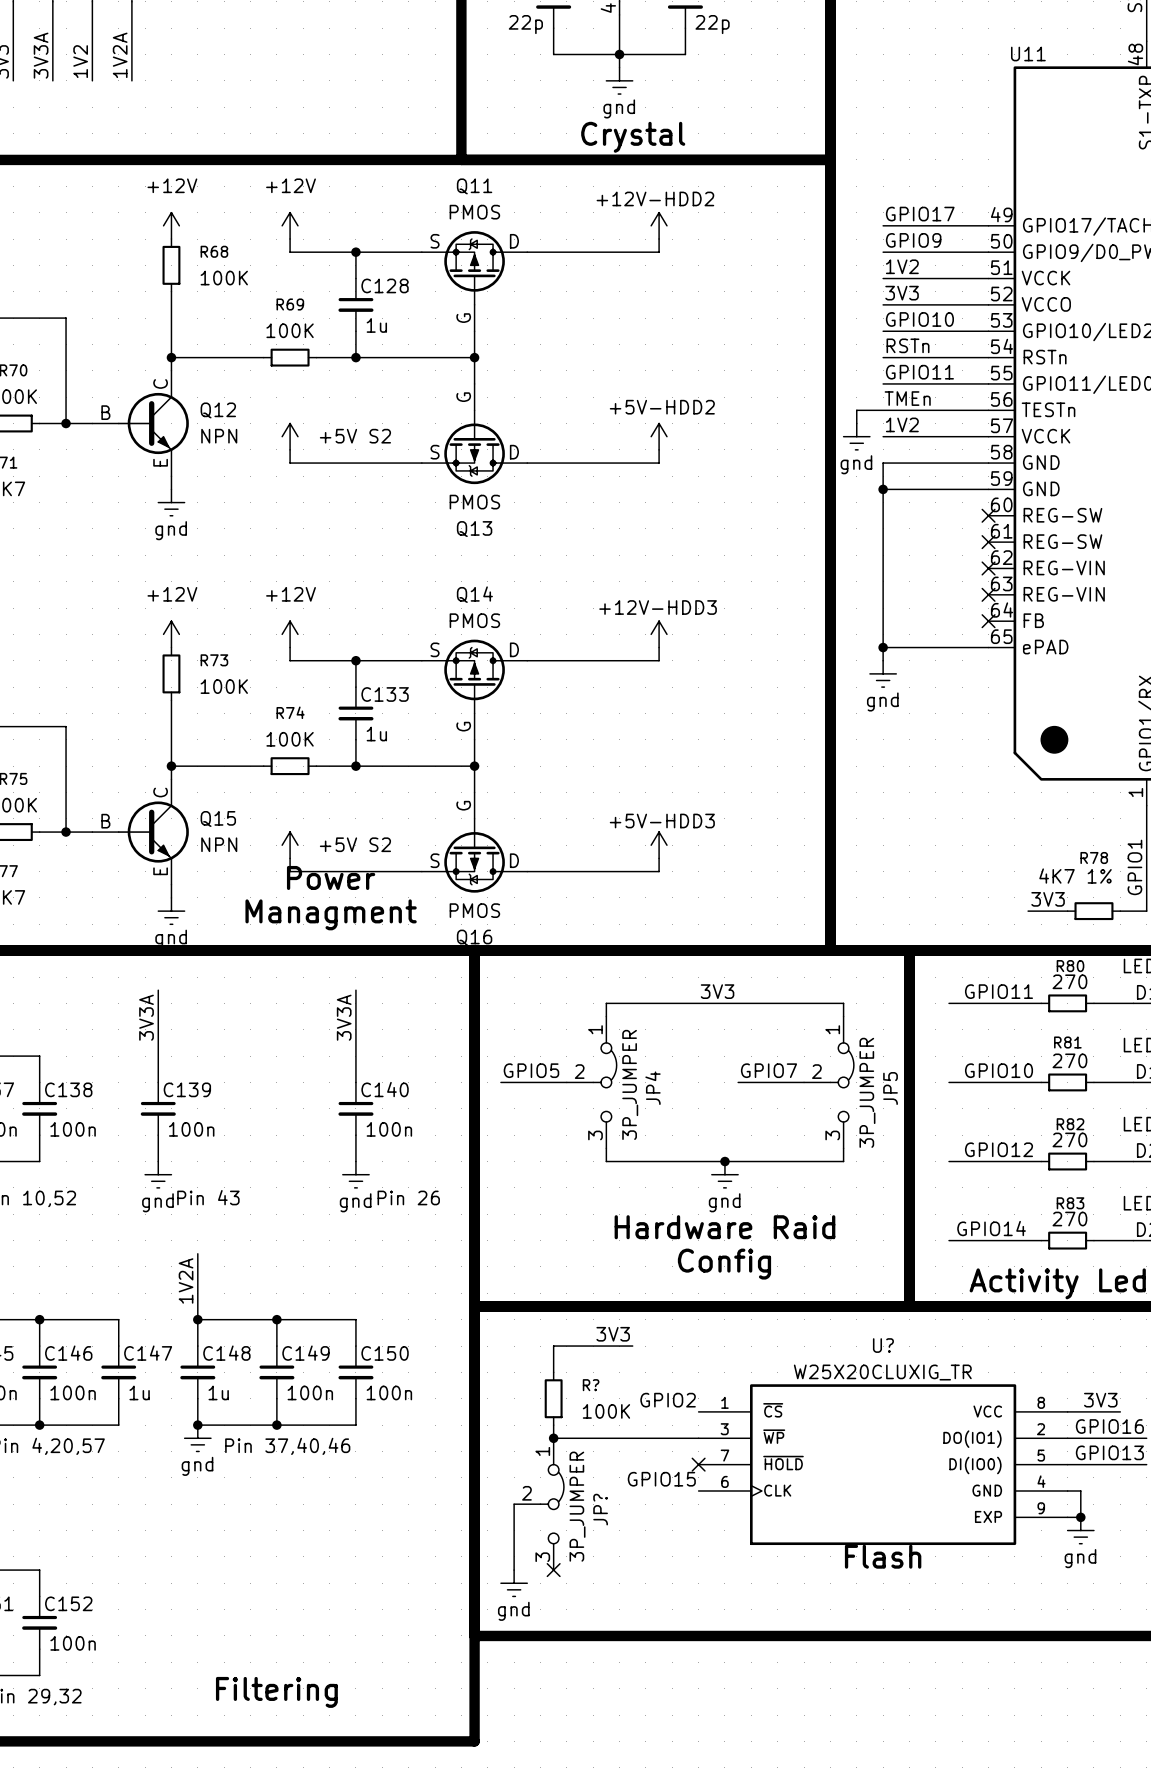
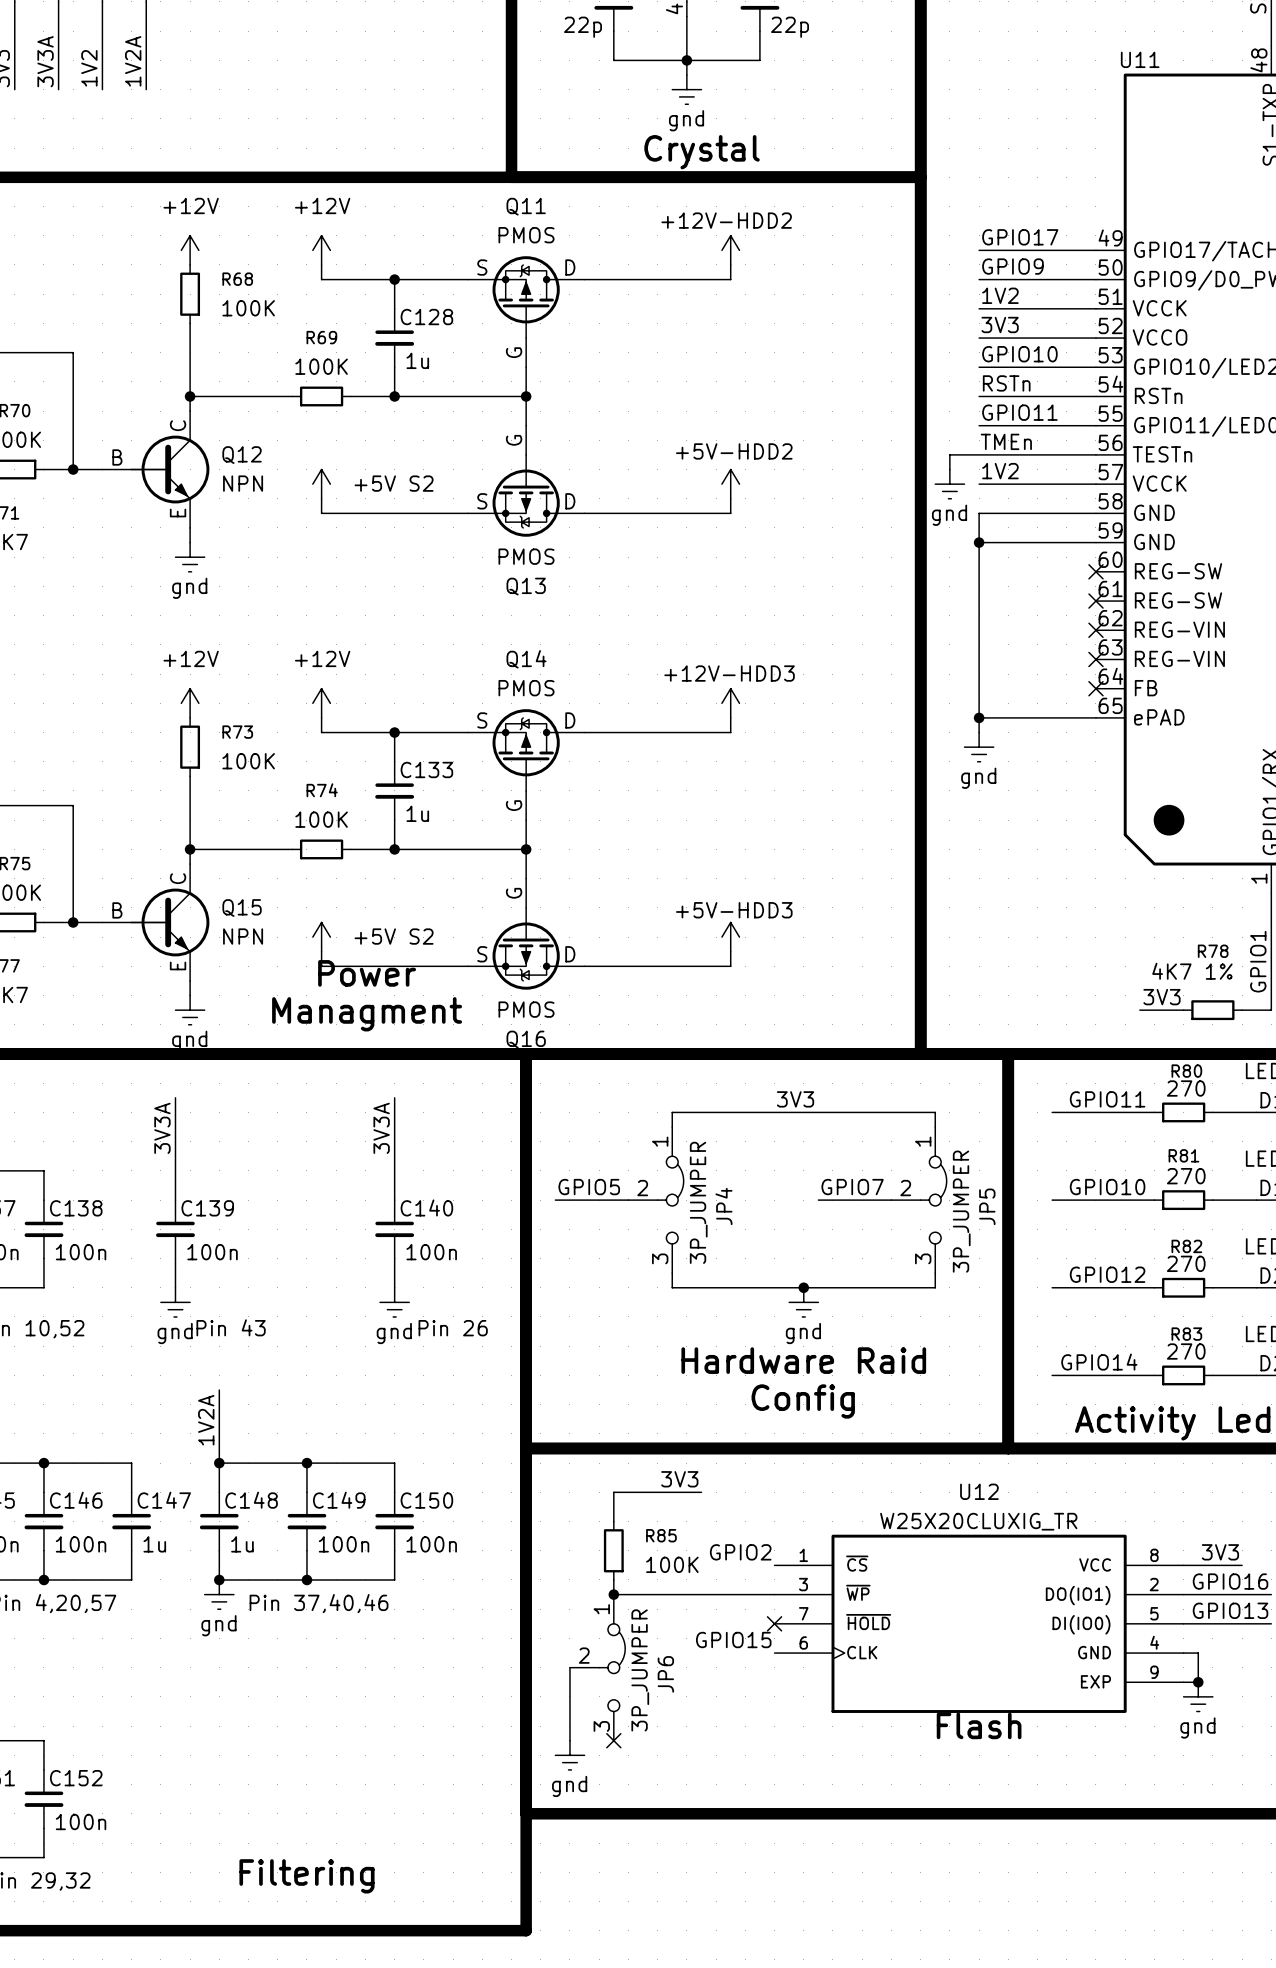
U? name: U? (883, 1345) -> U12 (979, 1491)
R? name: R? (591, 1385) -> R85 (661, 1535)
JP? name: JP? (600, 1509) -> JP6 (665, 1674)

